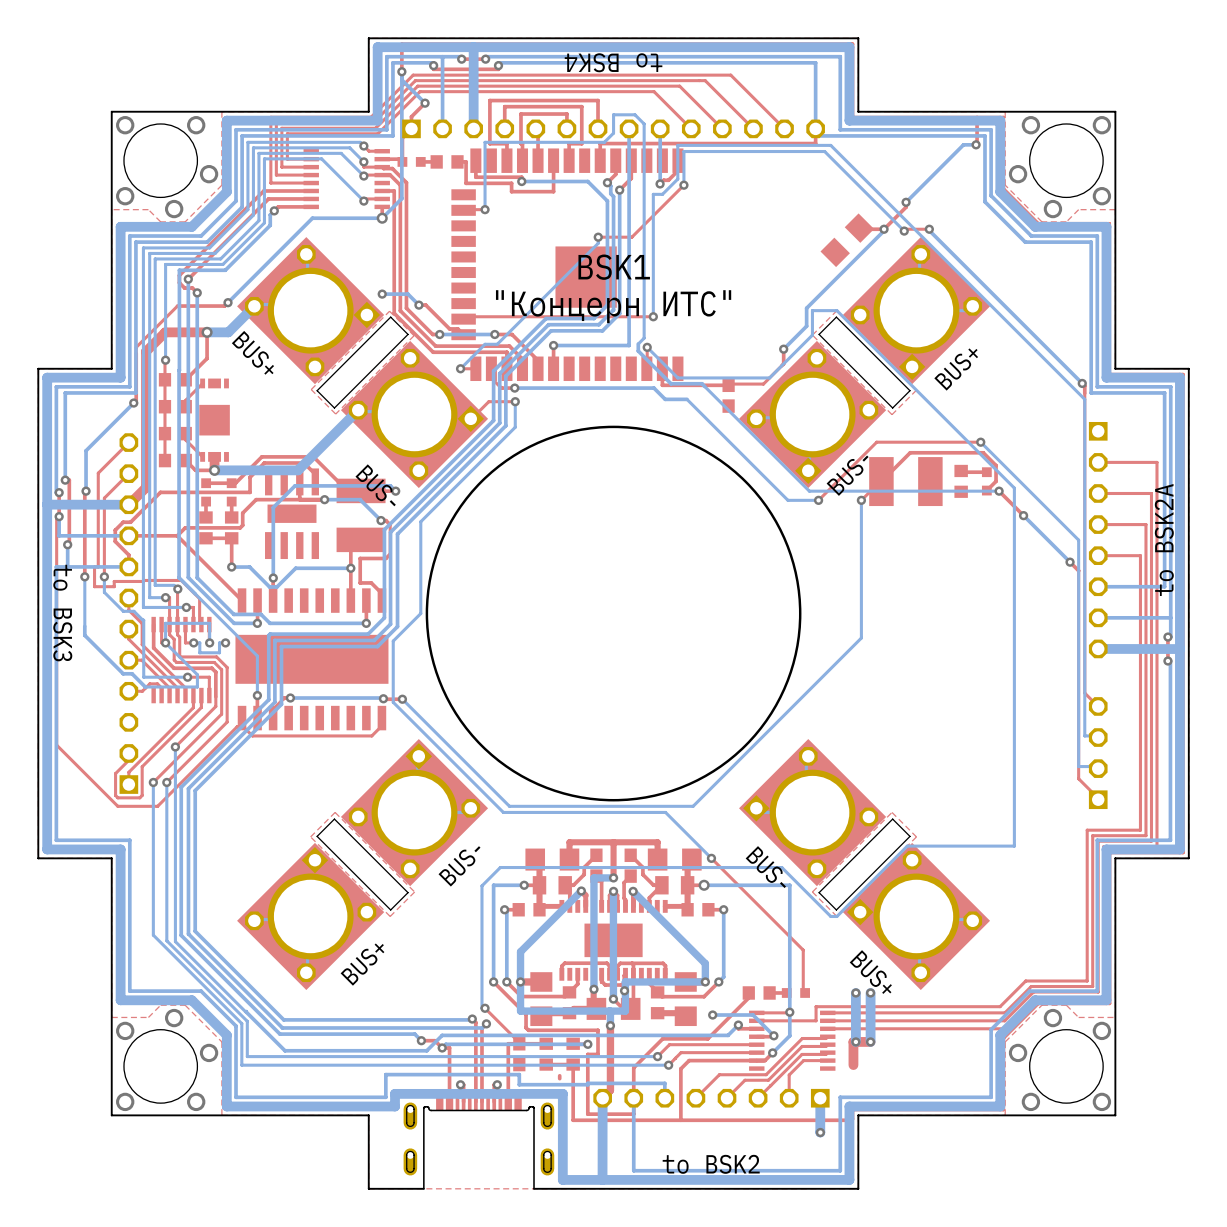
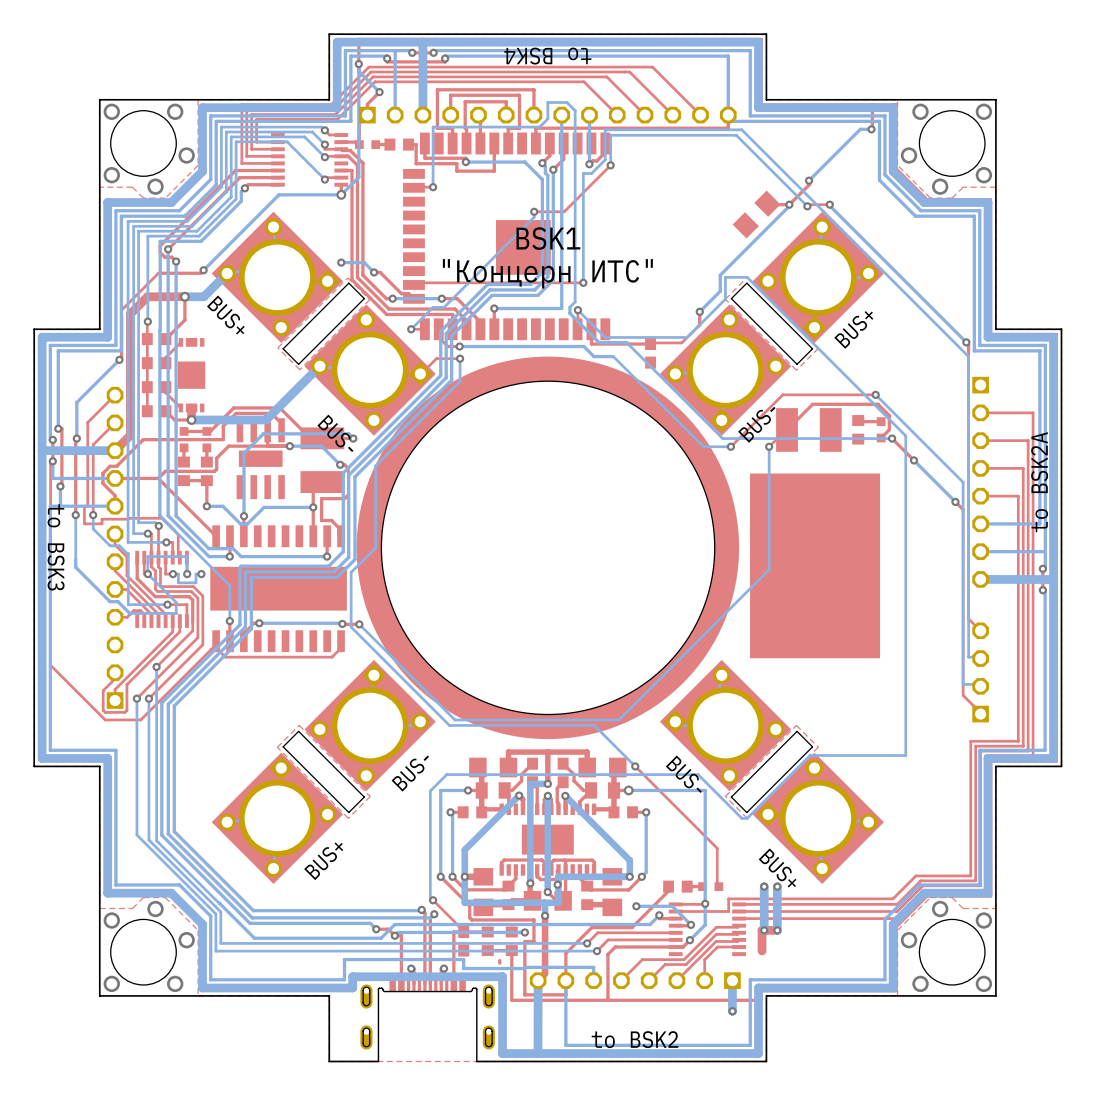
drawing: none -> [356, 356, 881, 740]
round board edge: [425, 425, 802, 802] -> none

